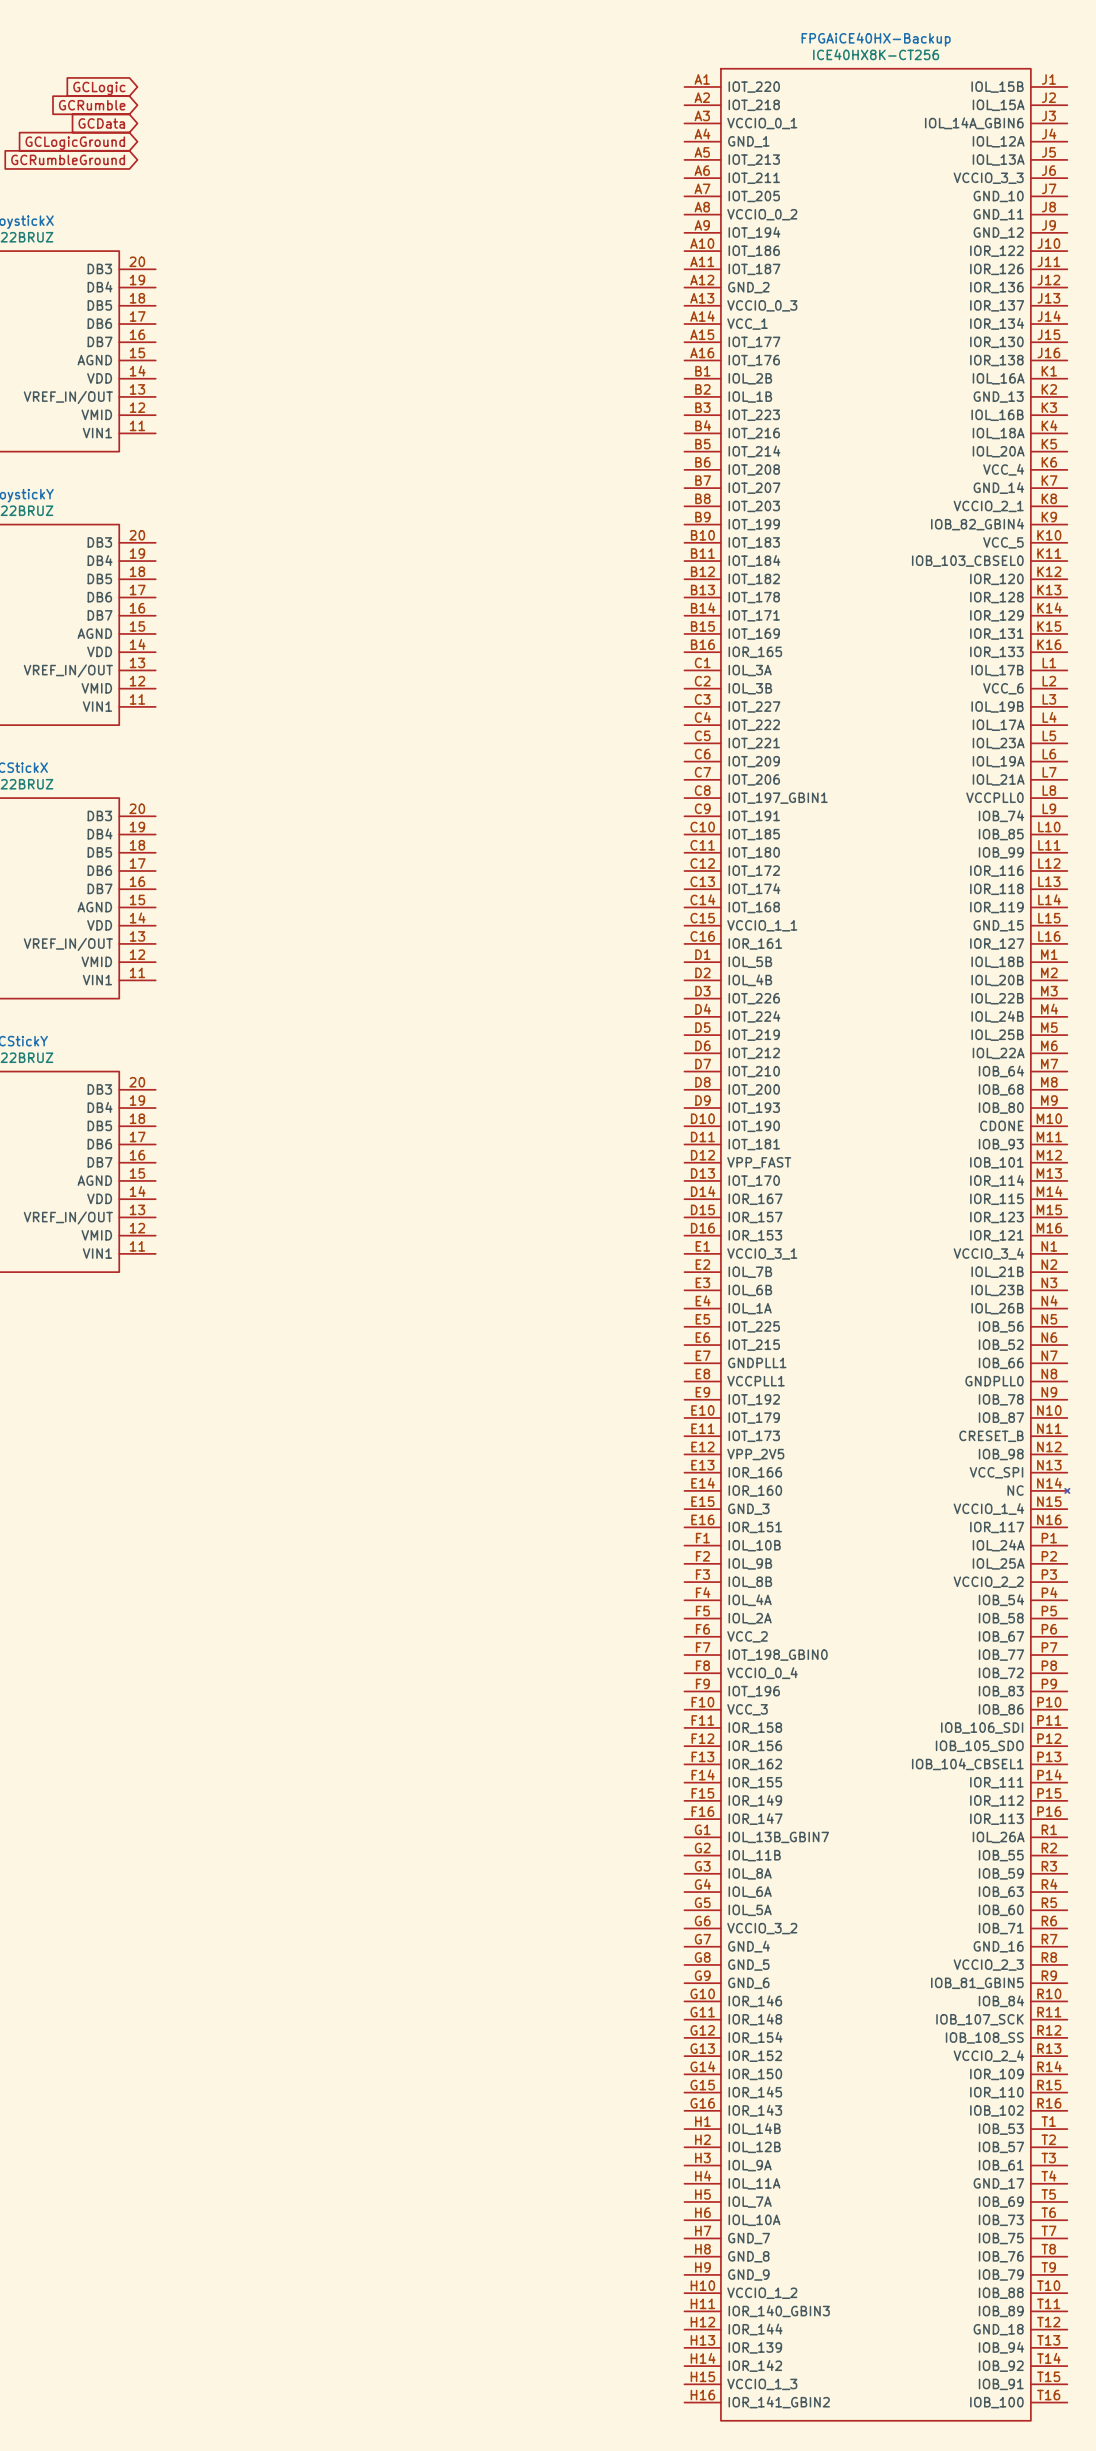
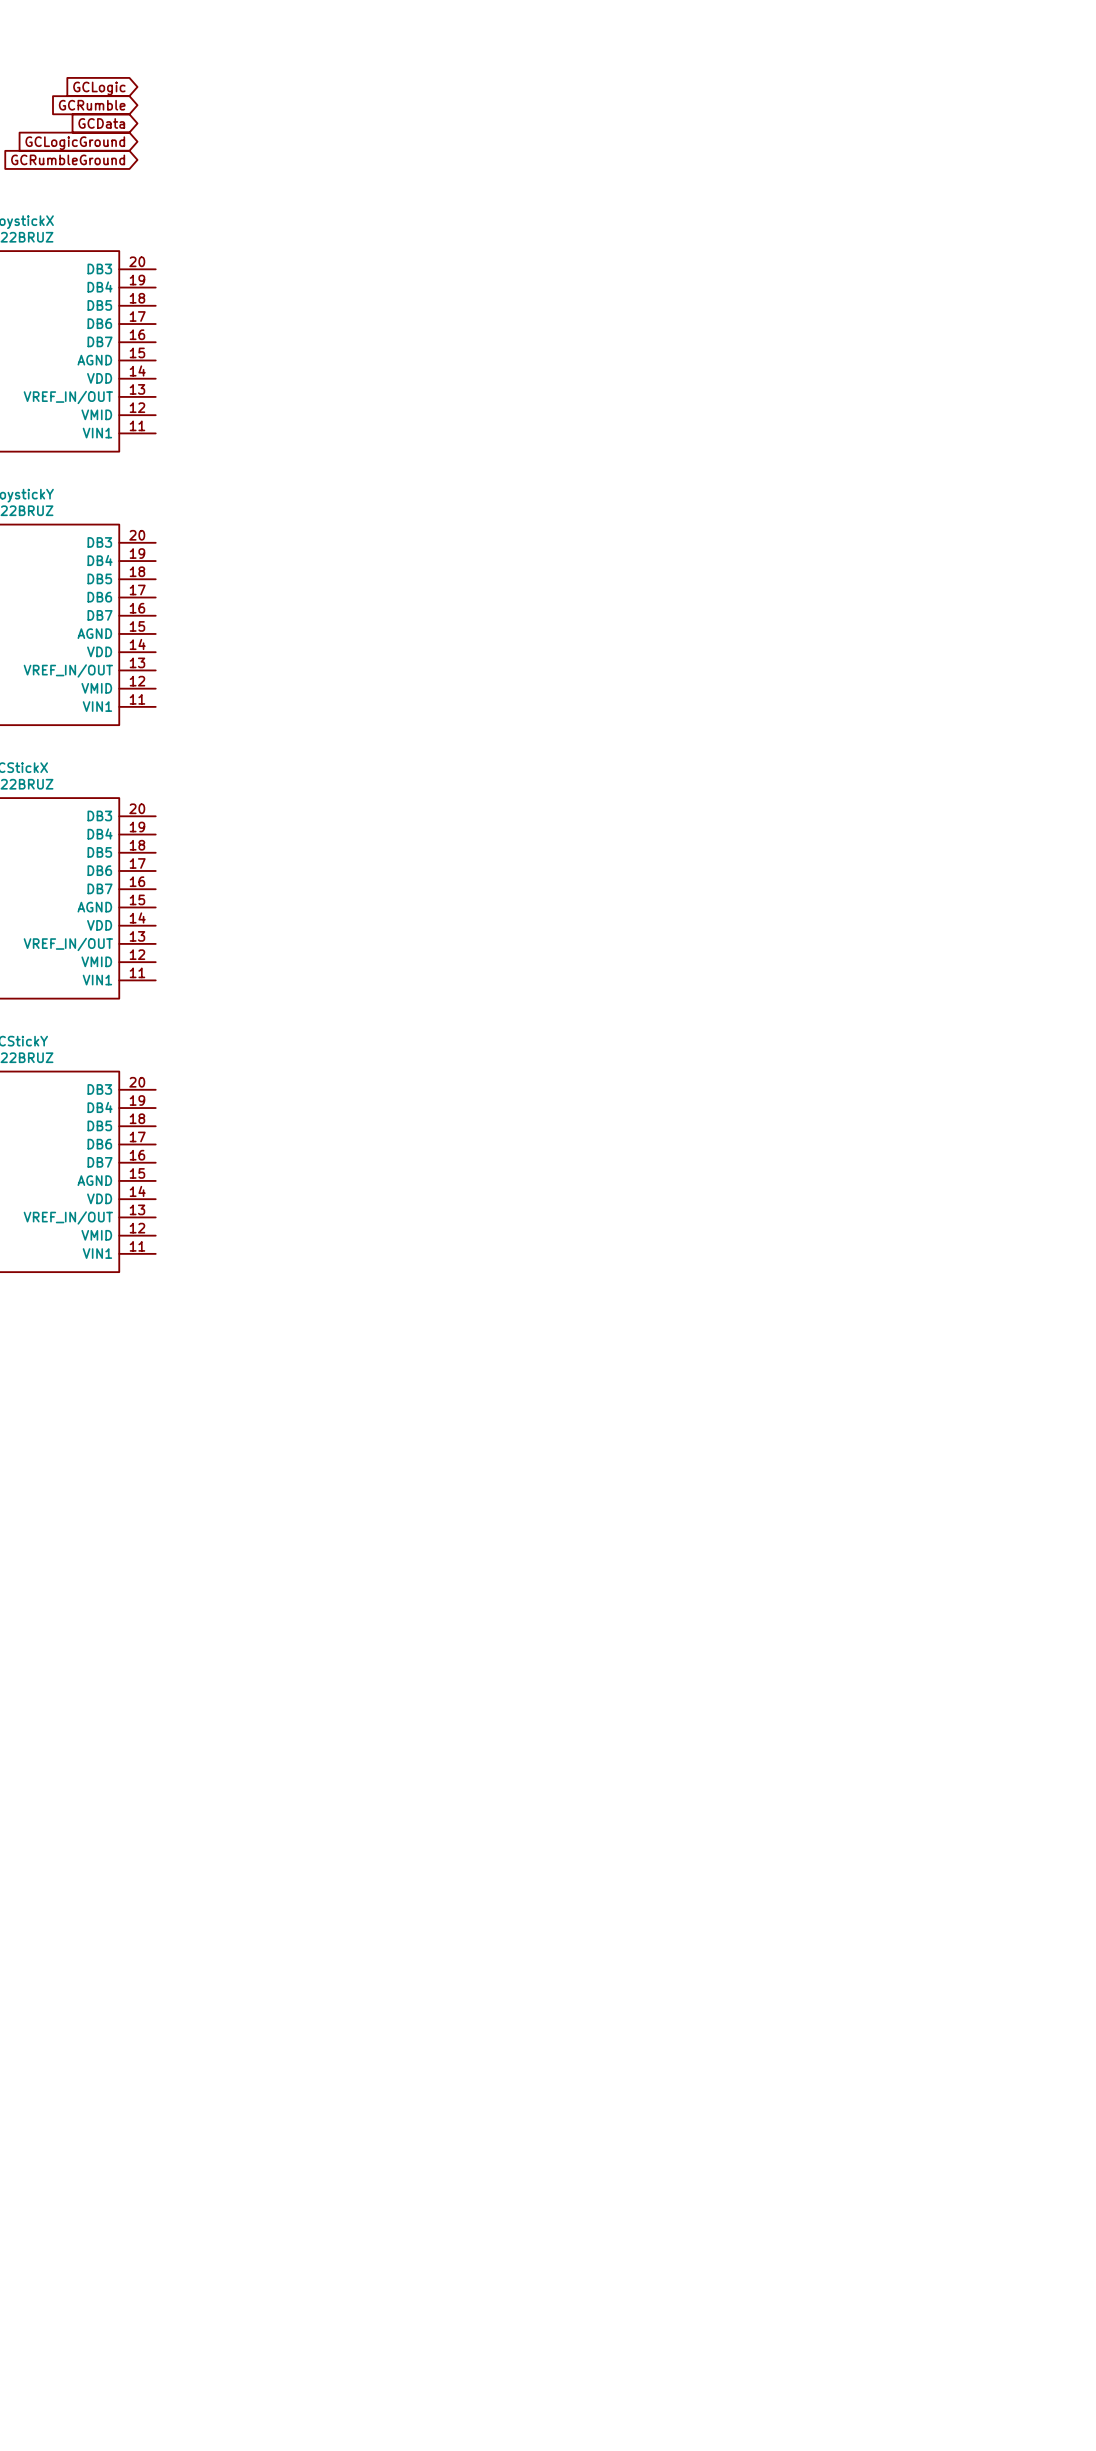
FPGAiCE40HX-Backup: ICE40HX8K-CT256 (876, 1244) -> none

